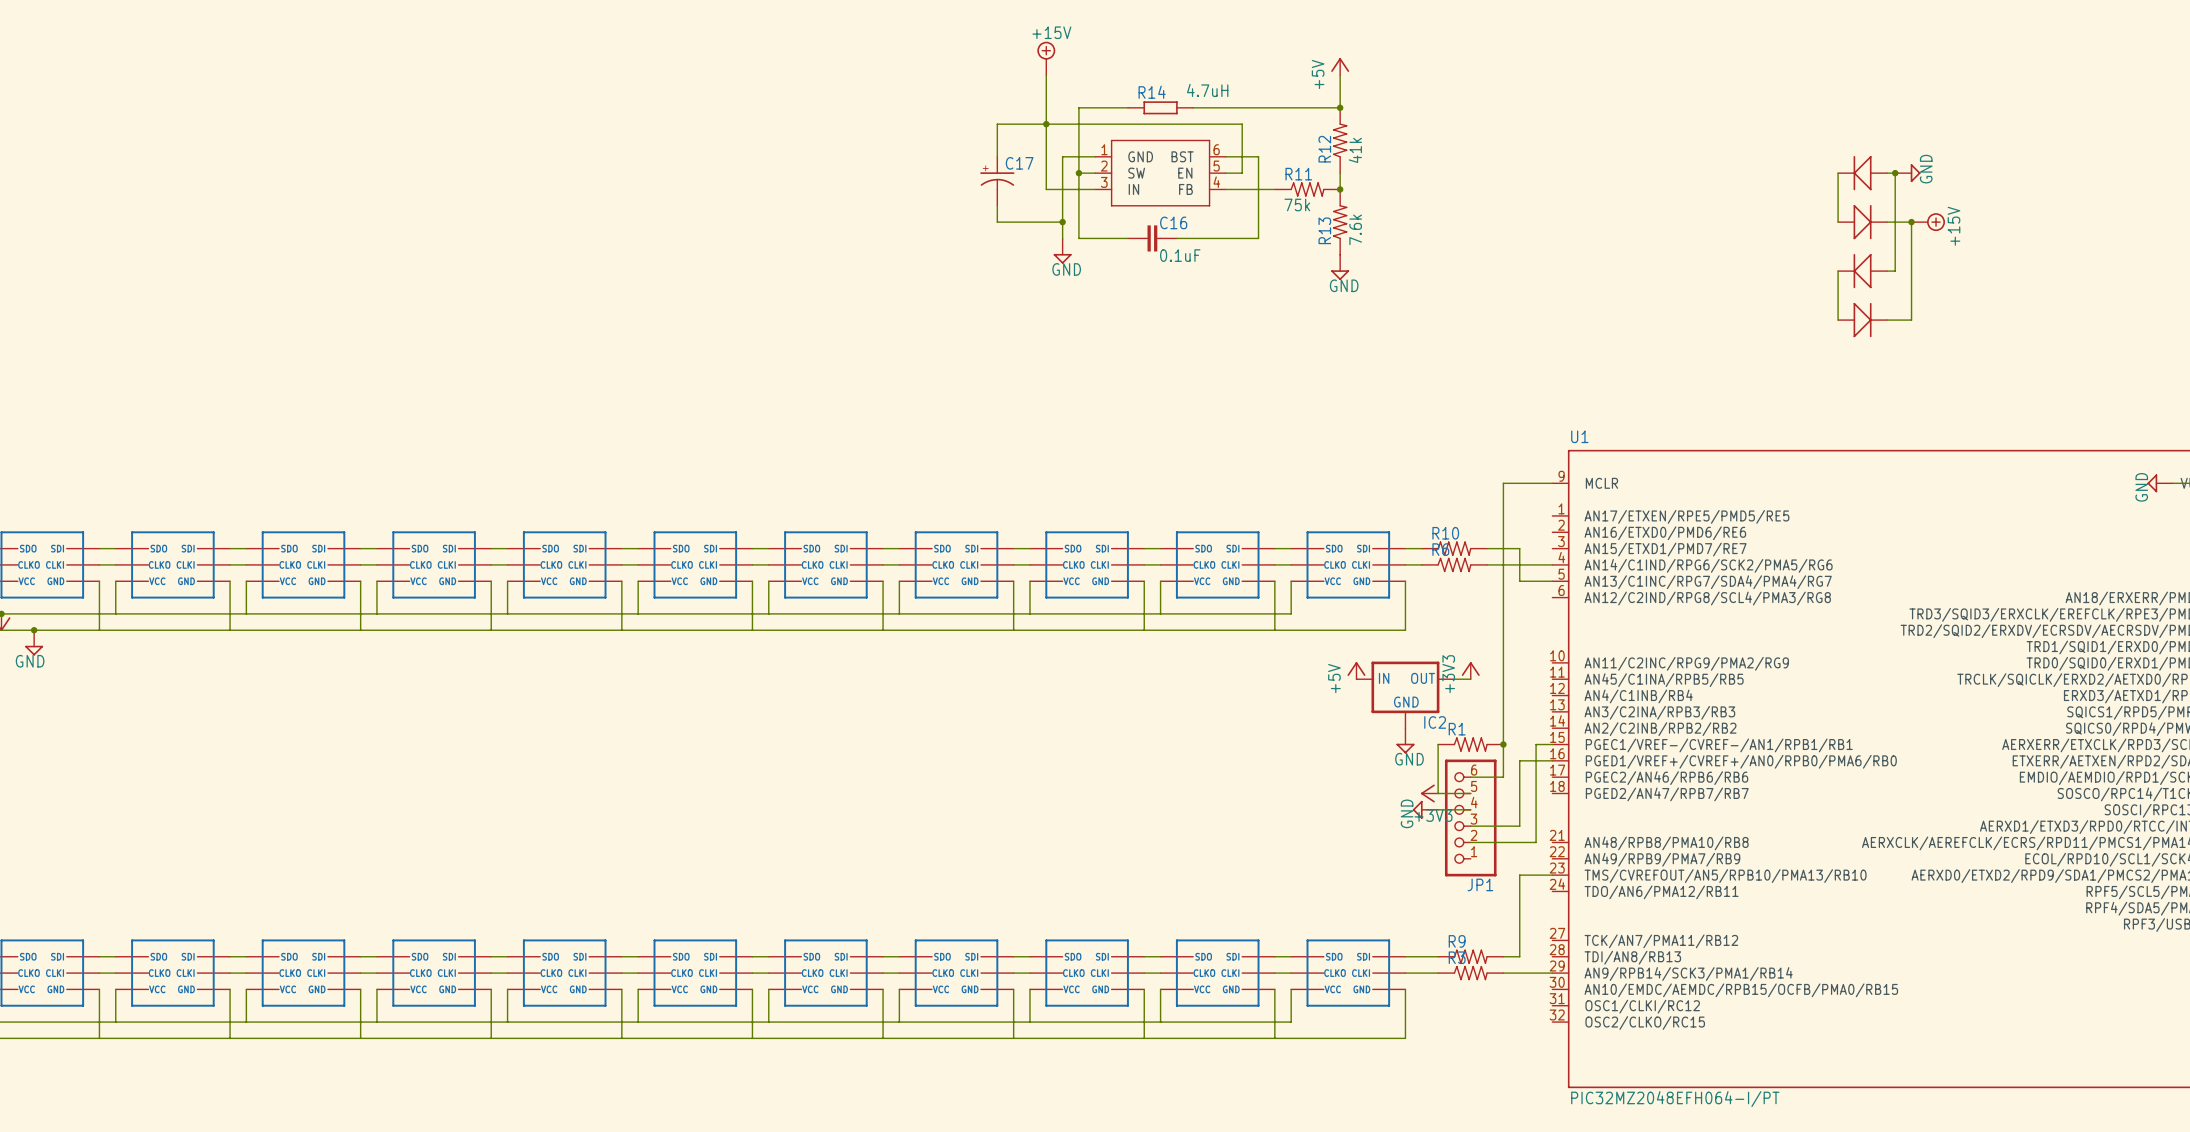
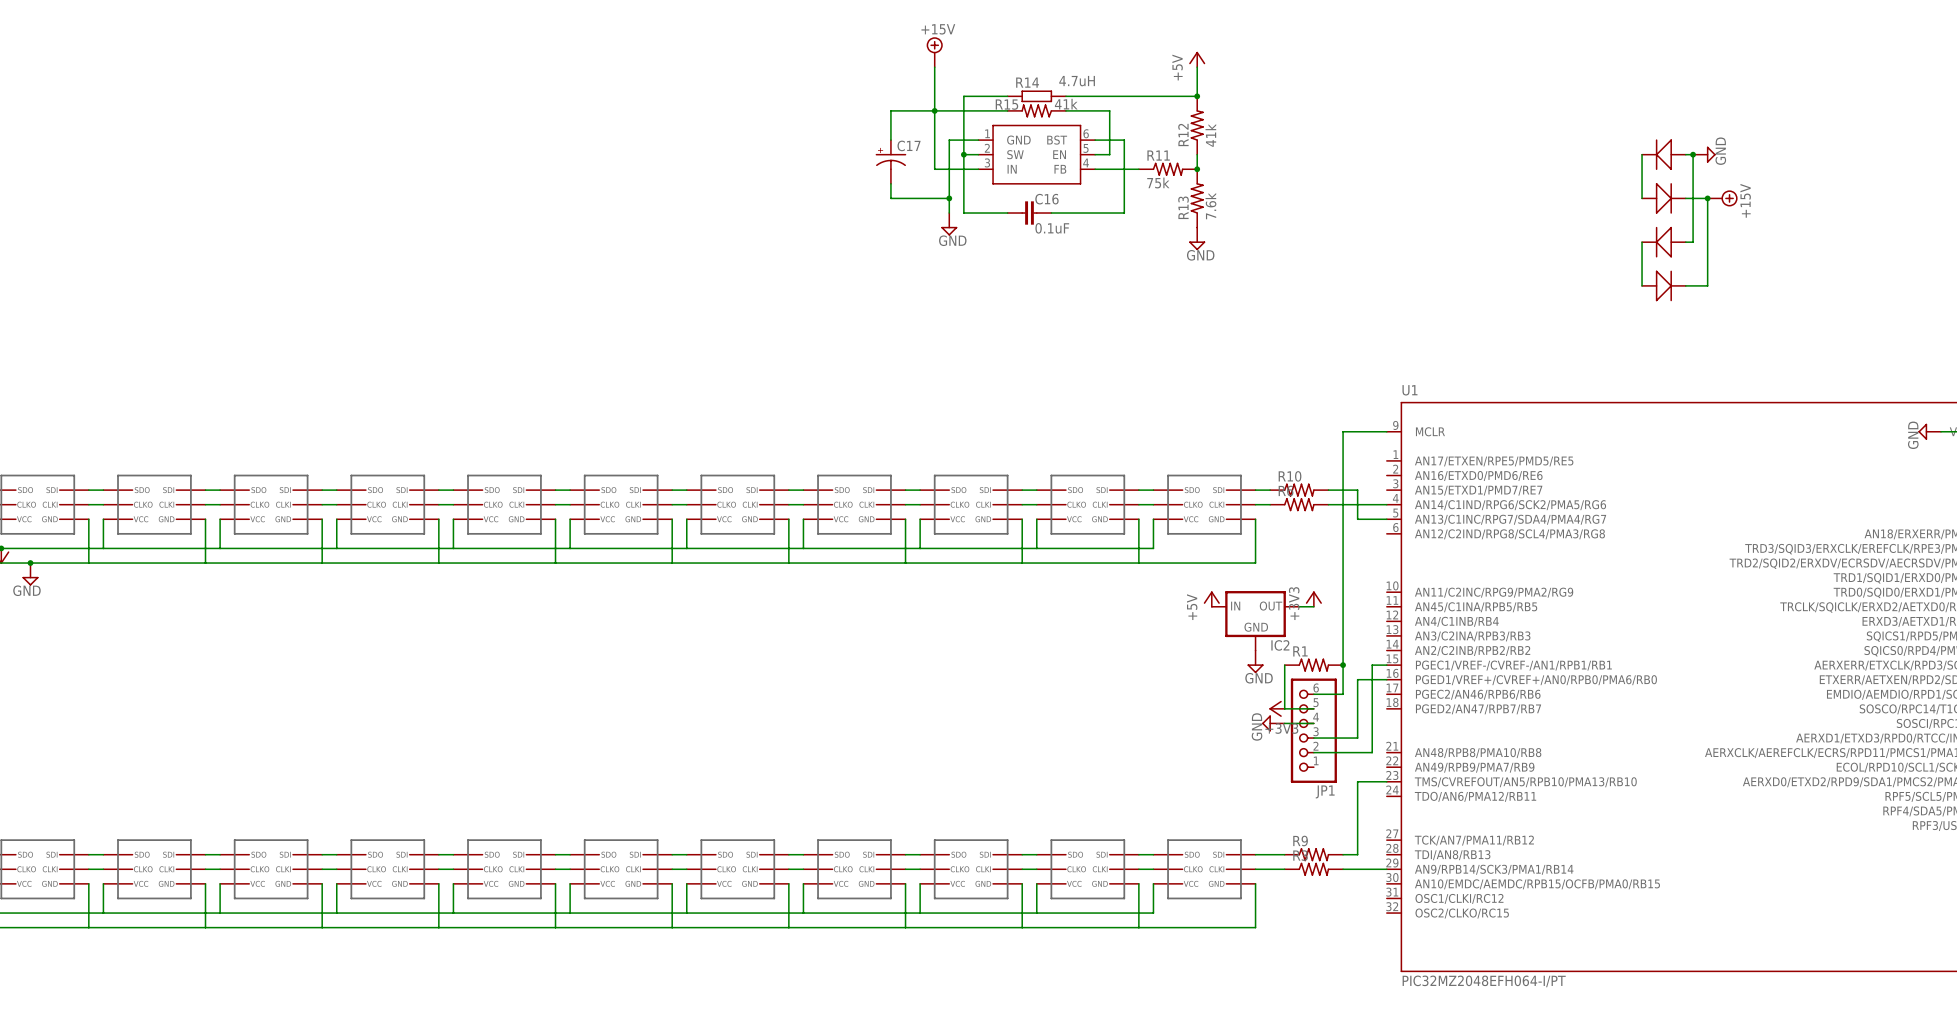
R15: none -> 41k (1036, 110)

